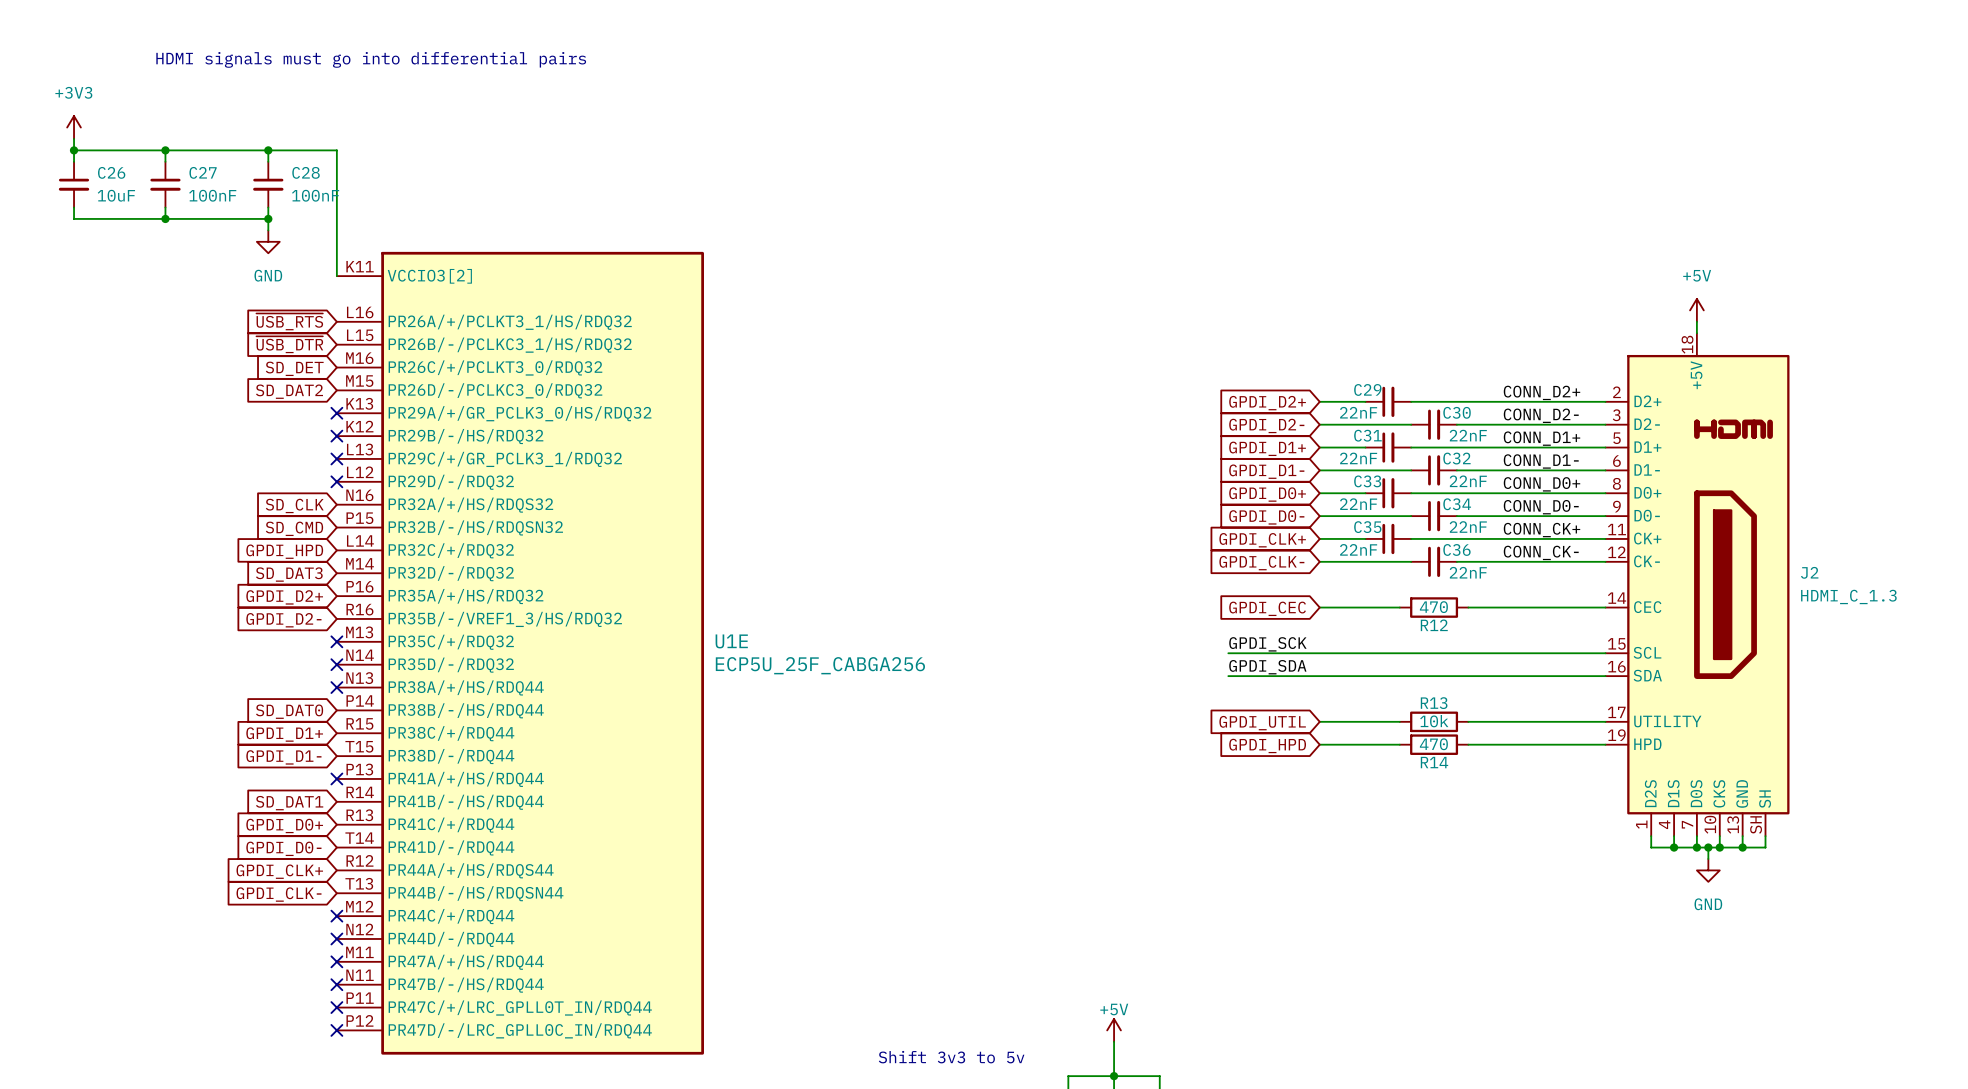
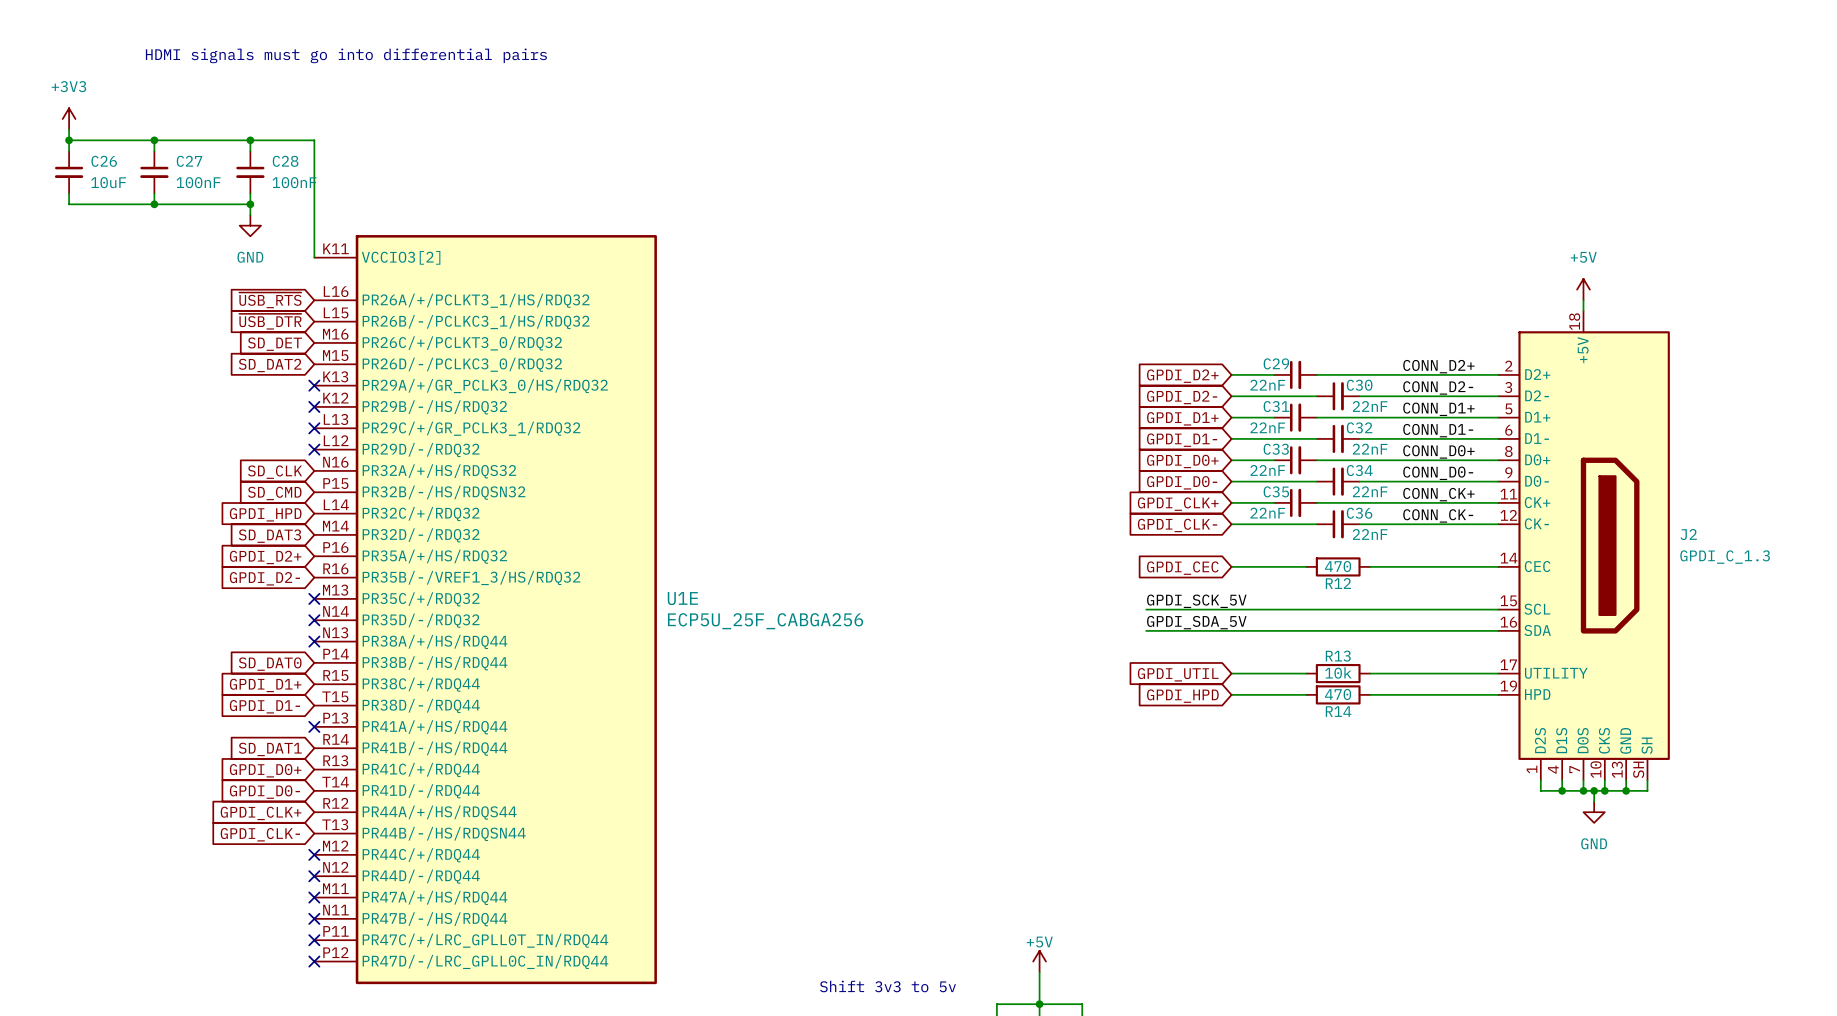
J2 symbol: [1605, 333, 1790, 837] -> [1498, 310, 1670, 781]
J2 value: HDMI_C_1.3 (1848, 596) -> GPDI_C_1.3 (1725, 557)
label: GPDI_SCK (1267, 644) -> GPDI_SCK_5V (1196, 601)
label: GPDI_SDA (1267, 667) -> GPDI_SDA_5V (1196, 622)

